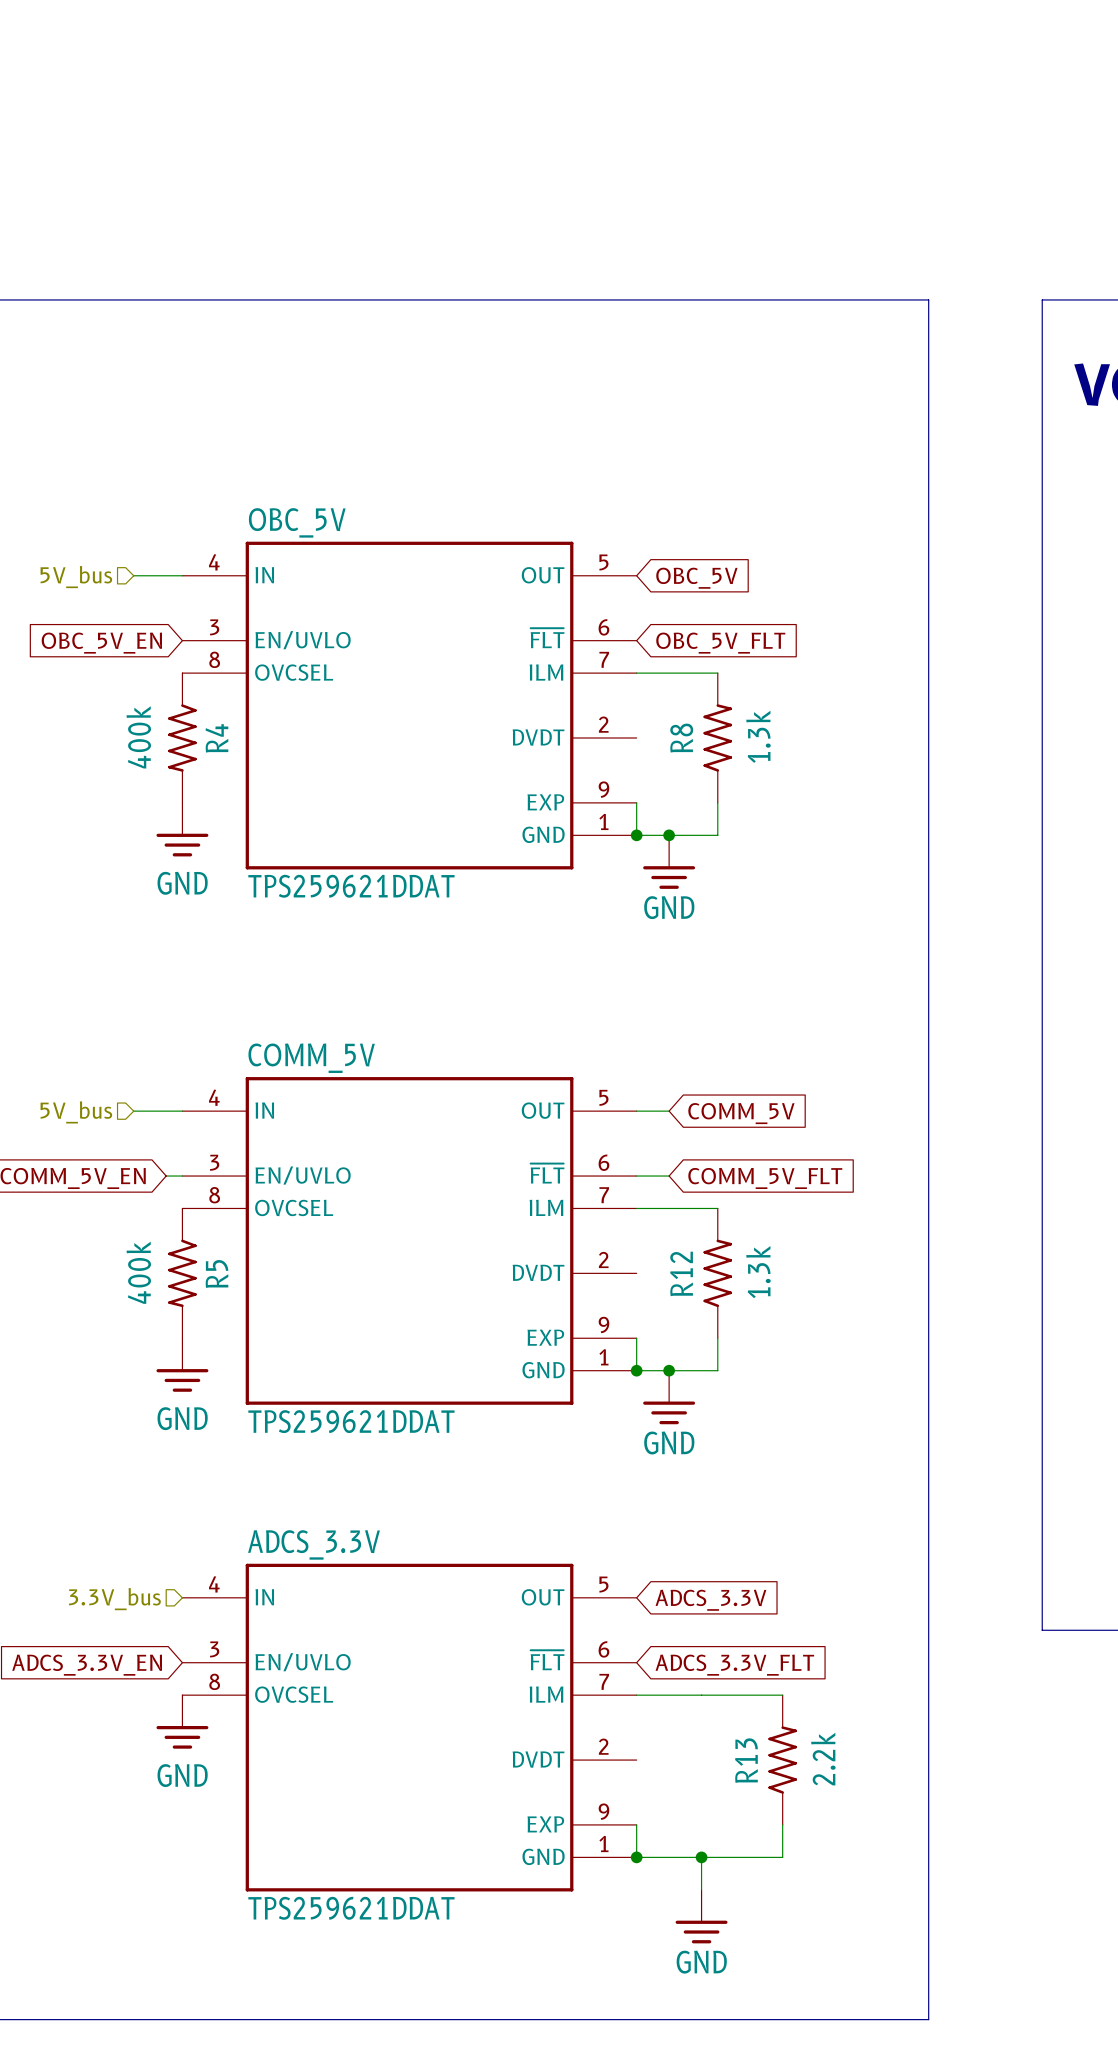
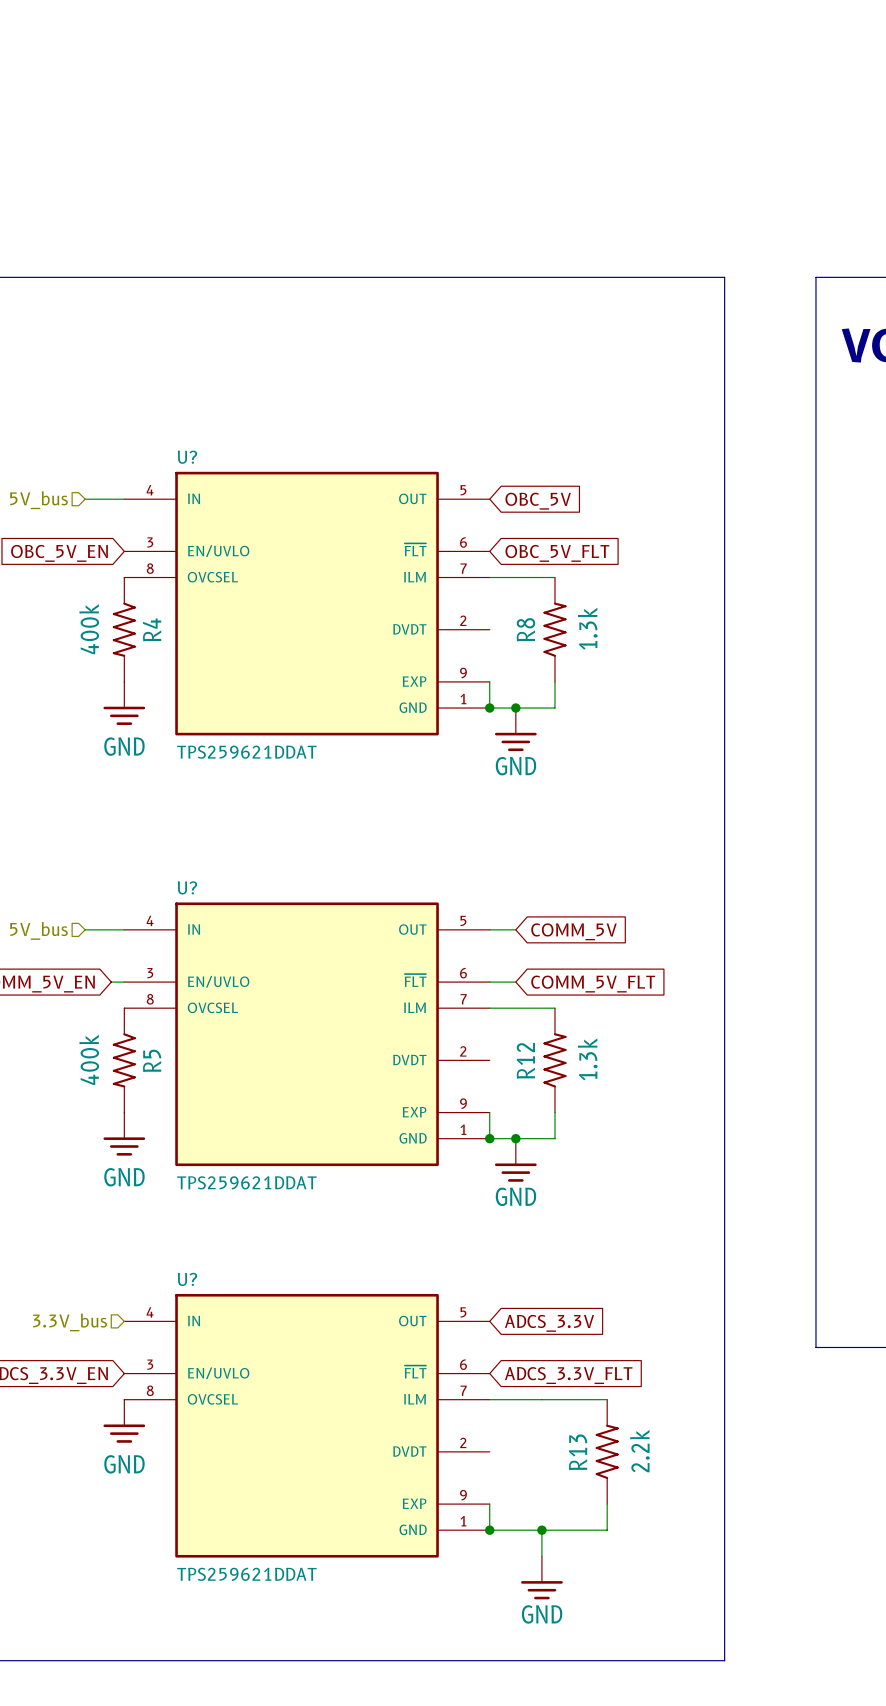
OBC_5V: TPS259621DDAT (409, 705) -> none
U?: none -> TPS259621DDAT (307, 603)
COMM_5V: TPS259621DDAT (409, 1240) -> none
U?: none -> TPS259621DDAT (307, 1034)
ADCS_3.3V: TPS259621DDAT (409, 1727) -> none
U?: none -> TPS259621DDAT (307, 1425)

